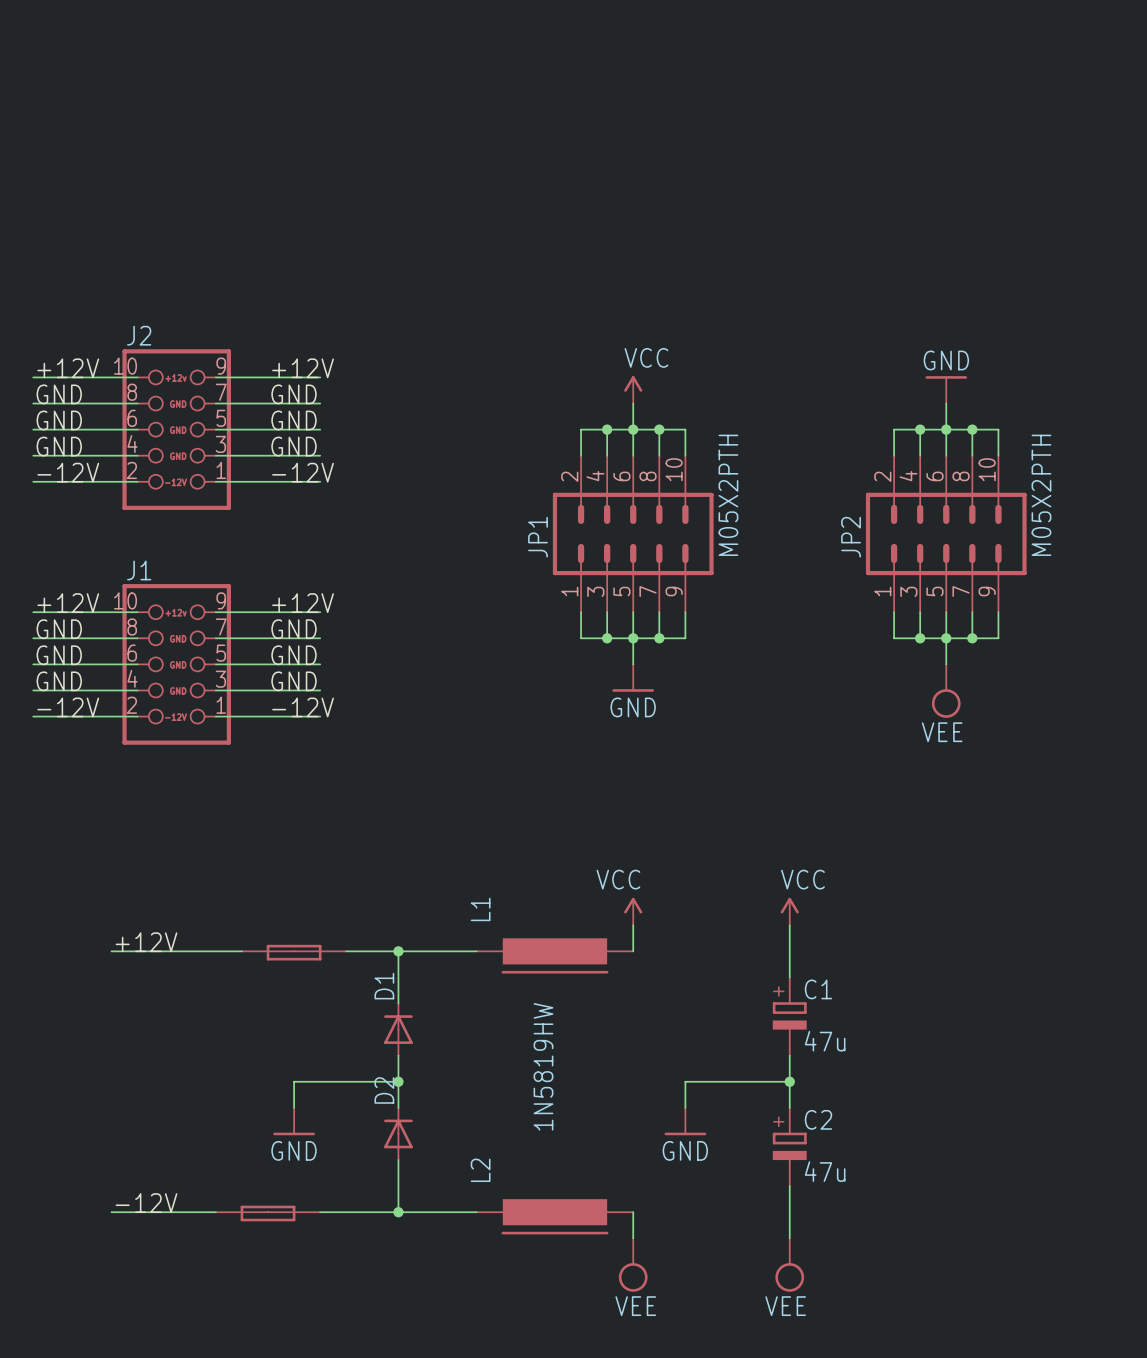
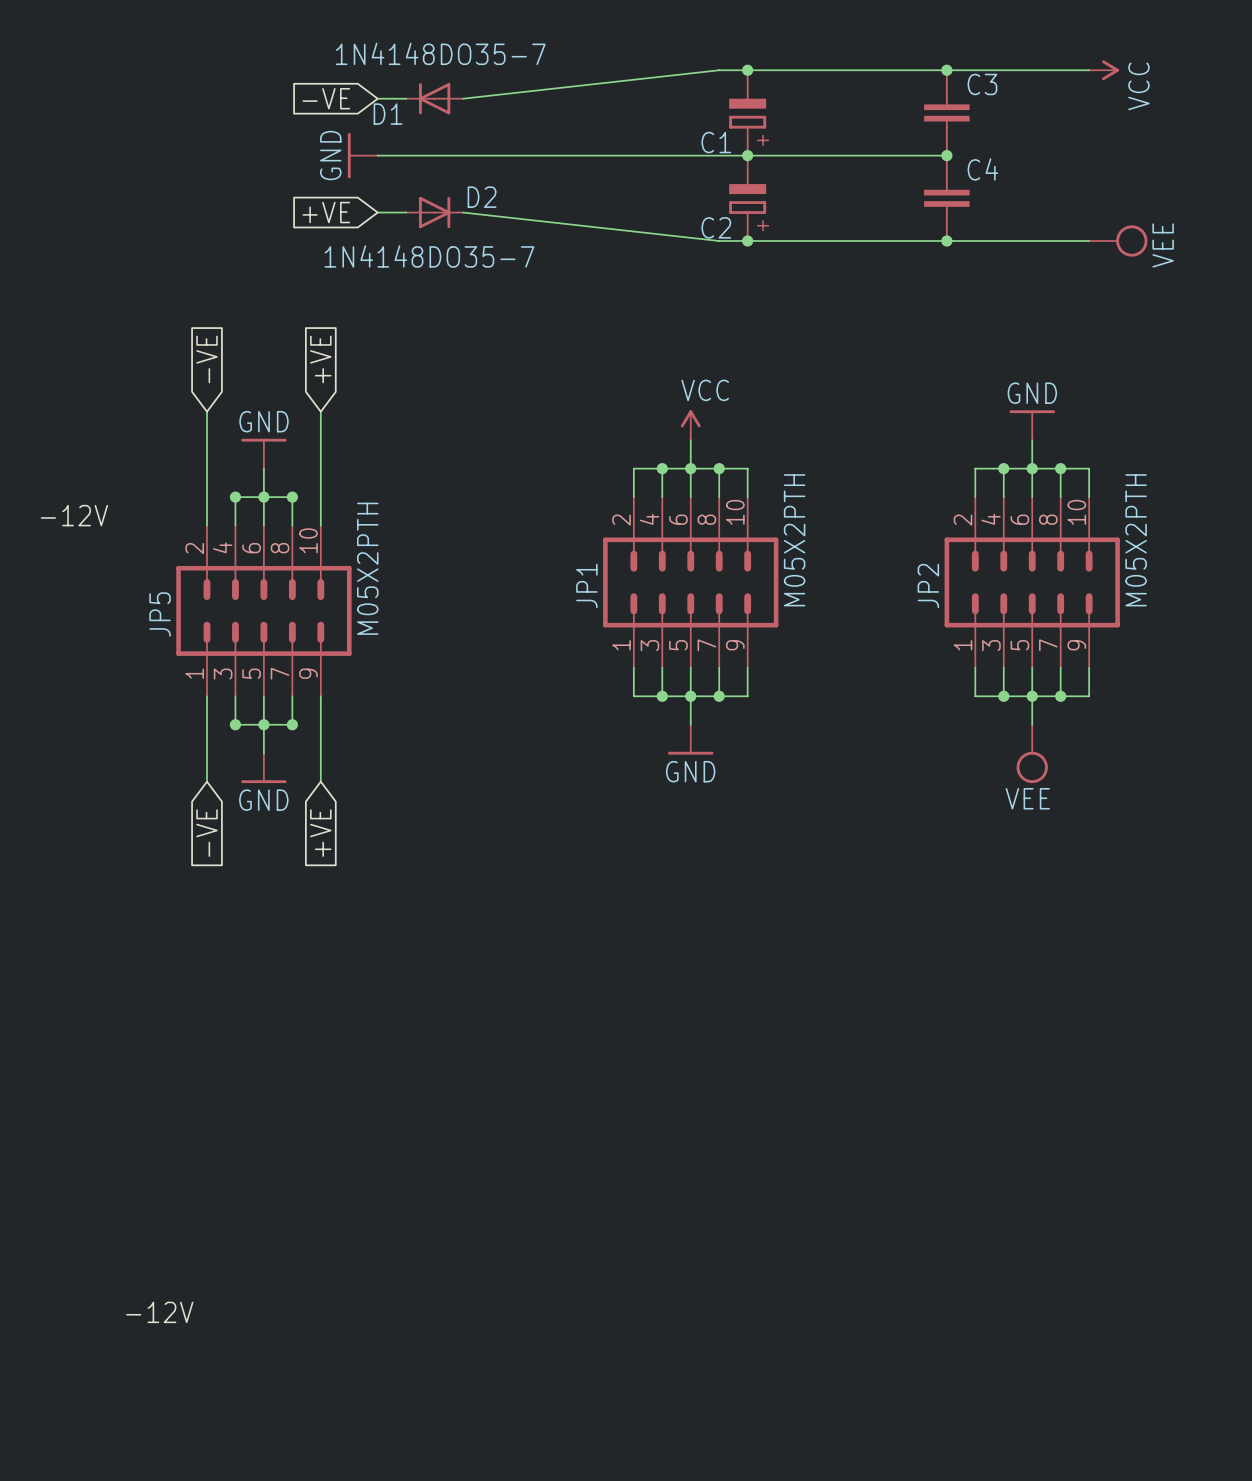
D1 value: none -> 1N4148DO35-7 (440, 53)
junction: none -> (747, 70)
junction: none -> (946, 70)
wire: none -> (1089, 70) (719, 70) (463, 98)
power symbol: none -> VCC (1104, 70)
global label: none -> -VE (326, 98)
wire: none -> (377, 98) (406, 98)
C3: none -> (946, 112)
power symbol: none -> GND (362, 155)
wire: none -> (377, 155) (946, 155)
junction: none -> (747, 155)
junction: none -> (946, 155)
C4: none -> (946, 198)
global label: none -> +VE (326, 212)
wire: none -> (377, 212) (406, 212)
wire: none -> (463, 212) (719, 240) (1089, 240)
junction: none -> (747, 240)
junction: none -> (946, 240)
power symbol: none -> VEE (1118, 240)
global label: none -> -VE (206, 359)
global label: none -> +VE (320, 359)
label: +12V (68, 368) -> none
label: +12V (303, 368) -> none
wire: (33, 377) (137, 377) -> none
wire: none -> (206, 411) (206, 525)
wire: (215, 377) (320, 377) -> none
wire: none -> (320, 411) (320, 525)
label: GND (59, 394) -> none
label: GND (294, 394) -> none
wire: (33, 403) (137, 403) -> none
wire: (215, 403) (320, 403) -> none
power symbol: none -> GND (263, 453)
label: GND (59, 420) -> none
label: GND (294, 420) -> none
wire: (33, 429) (137, 429) -> none
J2: (176, 429) -> none
wire: (215, 429) (320, 429) -> none
wire: none -> (263, 468) (263, 525)
label: GND (59, 446) -> none
label: GND (294, 446) -> none
wire: (33, 455) (137, 455) -> none
junction: none -> (235, 497)
junction: none -> (263, 497)
wire: (268, 455) (320, 455) -> (292, 497) (292, 525)
junction: none -> (292, 497)
label: -12V (303, 472) -> none
wire: (33, 481) (137, 481) -> none
wire: (215, 481) (320, 481) -> (235, 525) (235, 497)
JP5: none -> M05X2PTH (263, 610)
label: +12V (68, 603) -> none
label: +12V (303, 603) -> none
wire: (33, 612) (137, 612) -> none
wire: (215, 612) (320, 612) -> none
label: GND (59, 629) -> none
label: GND (294, 629) -> none
wire: (33, 638) (137, 638) -> none
wire: none -> (206, 696) (206, 781)
wire: (215, 638) (320, 638) -> (235, 696) (235, 724)
wire: none -> (263, 696) (263, 753)
wire: none -> (320, 696) (320, 781)
label: GND (59, 655) -> none
label: GND (294, 655) -> none
wire: (33, 664) (137, 664) -> none
J1: (176, 664) -> none
junction: none -> (235, 724)
junction: none -> (263, 724)
wire: (268, 664) (320, 664) -> (292, 724) (292, 696)
junction: none -> (292, 724)
label: GND (59, 681) -> none
label: GND (294, 681) -> none
wire: (33, 690) (137, 690) -> none
wire: (215, 690) (320, 690) -> none
power symbol: none -> GND (263, 768)
label: -12V (68, 707) -> none
label: -12V (303, 707) -> none
wire: (33, 716) (137, 716) -> none
wire: (215, 716) (320, 716) -> none
global label: none -> -VE (206, 833)
global label: none -> +VE (320, 833)
power symbol: VCC (633, 911) -> none
power symbol: VCC (789, 911) -> none
wire: (633, 925) (633, 951) -> none
wire: (789, 925) (789, 977) -> none
label: +12V (146, 942) -> none
wire: (111, 951) (241, 951) -> none
wire: (346, 951) (476, 951) -> none
wire: (398, 951) (398, 1003) -> none
junction: (398, 951) -> none
part: (294, 952) -> none
L1: (554, 955) -> none
C1 symbol: [772, 977, 807, 1056] -> [729, 70, 767, 156]
C1 name position: C1 (818, 989) -> C1 (716, 142)
D1 rotation: 0° (398, 1029) -> 90° counterclockwise (434, 98)
D1 position: (398, 1029) -> (434, 98)
C1 value: 47u (825, 1041) -> none
wire: (398, 1055) (398, 1107) -> none
wire: (789, 1055) (789, 1107) -> none
D2 value: 1N5819HW (543, 1066) -> 1N4148DO35-7 (429, 256)
wire: (398, 1081) (294, 1081) (294, 1107) -> none
junction: (398, 1081) -> none
wire: (789, 1081) (685, 1081) (685, 1107) -> none
junction: (789, 1081) -> none
C2 symbol: [772, 1107, 807, 1187] -> [729, 155, 767, 241]
C2 name position: C2 (818, 1119) -> C2 (716, 227)
power symbol: GND (294, 1121) -> none
power symbol: GND (685, 1121) -> none
D2 rotation: 0° (398, 1133) -> 90° clockwise (434, 212)
D2 position: (398, 1133) -> (434, 212)
wire: (398, 1160) (398, 1212) -> none
C2 value: 47u (825, 1171) -> none
wire: (789, 1186) (789, 1238) -> none
wire: (111, 1212) (215, 1212) -> none
wire: (320, 1212) (476, 1212) -> none
junction: (398, 1212) -> none
wire: (633, 1212) (633, 1238) -> none
part: (268, 1213) -> none
L2: (554, 1216) -> none
power symbol: VEE (633, 1265) -> none
power symbol: VEE (789, 1265) -> none

